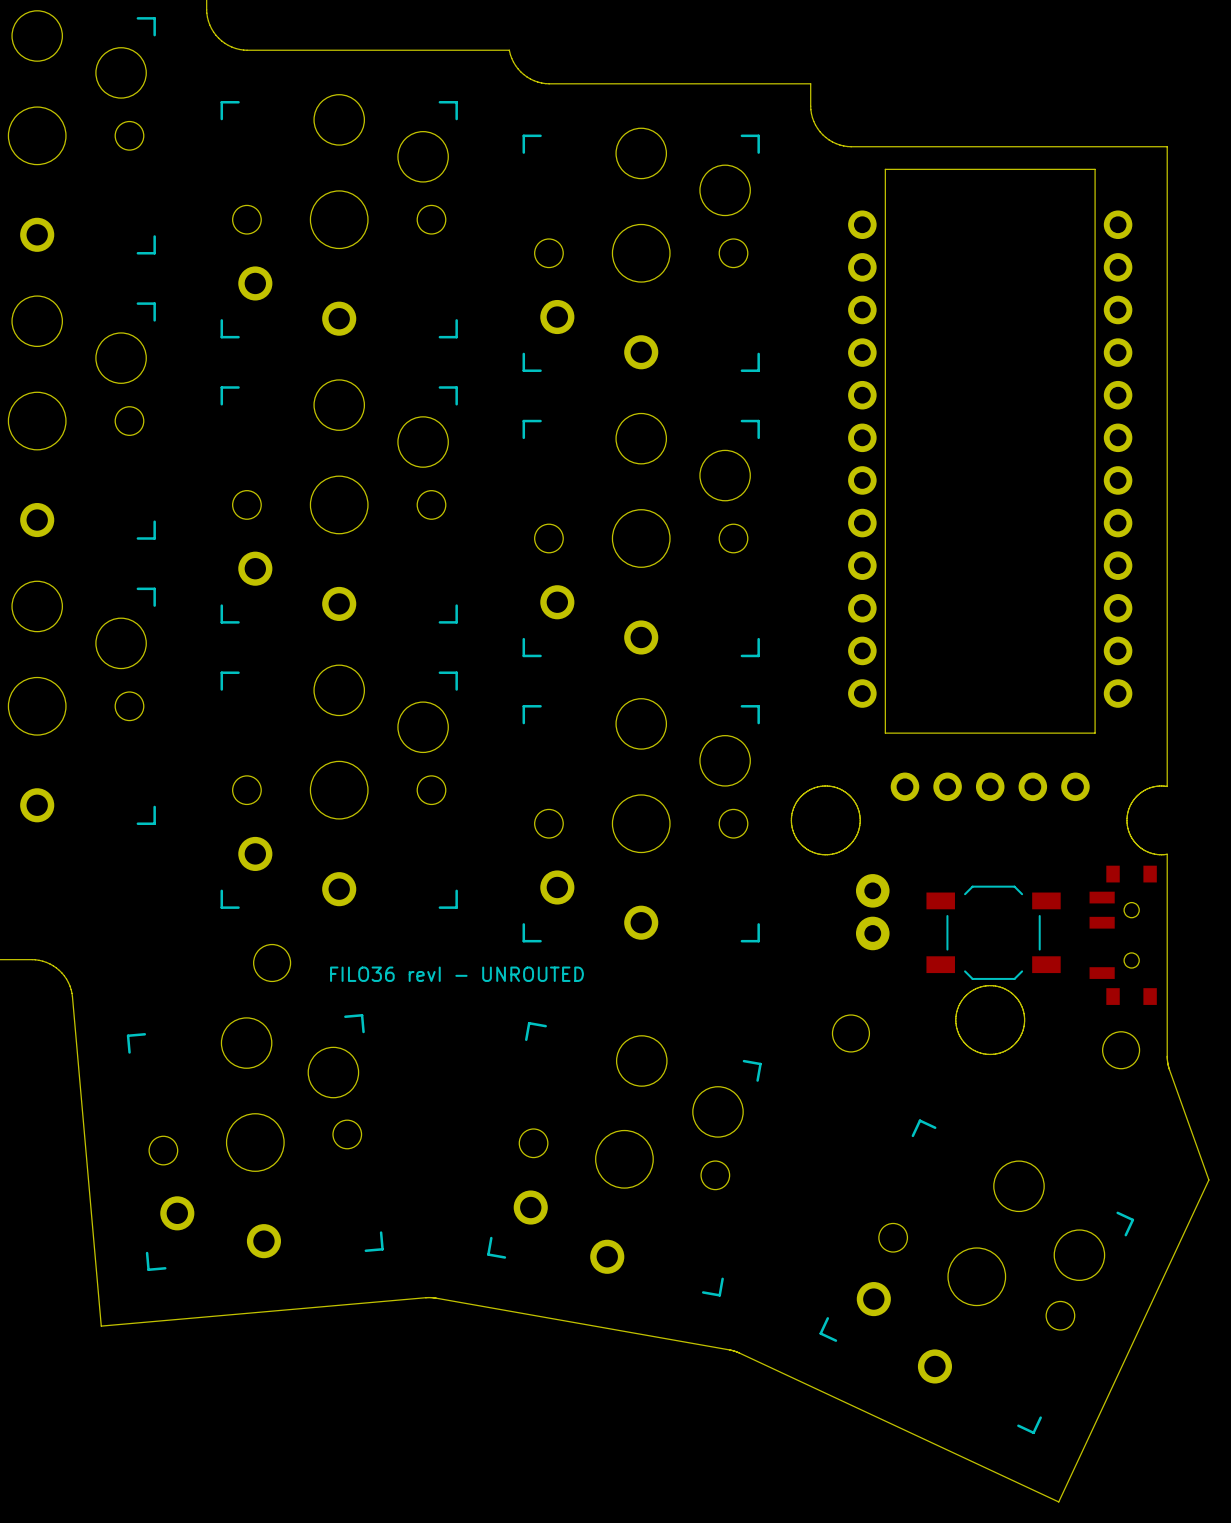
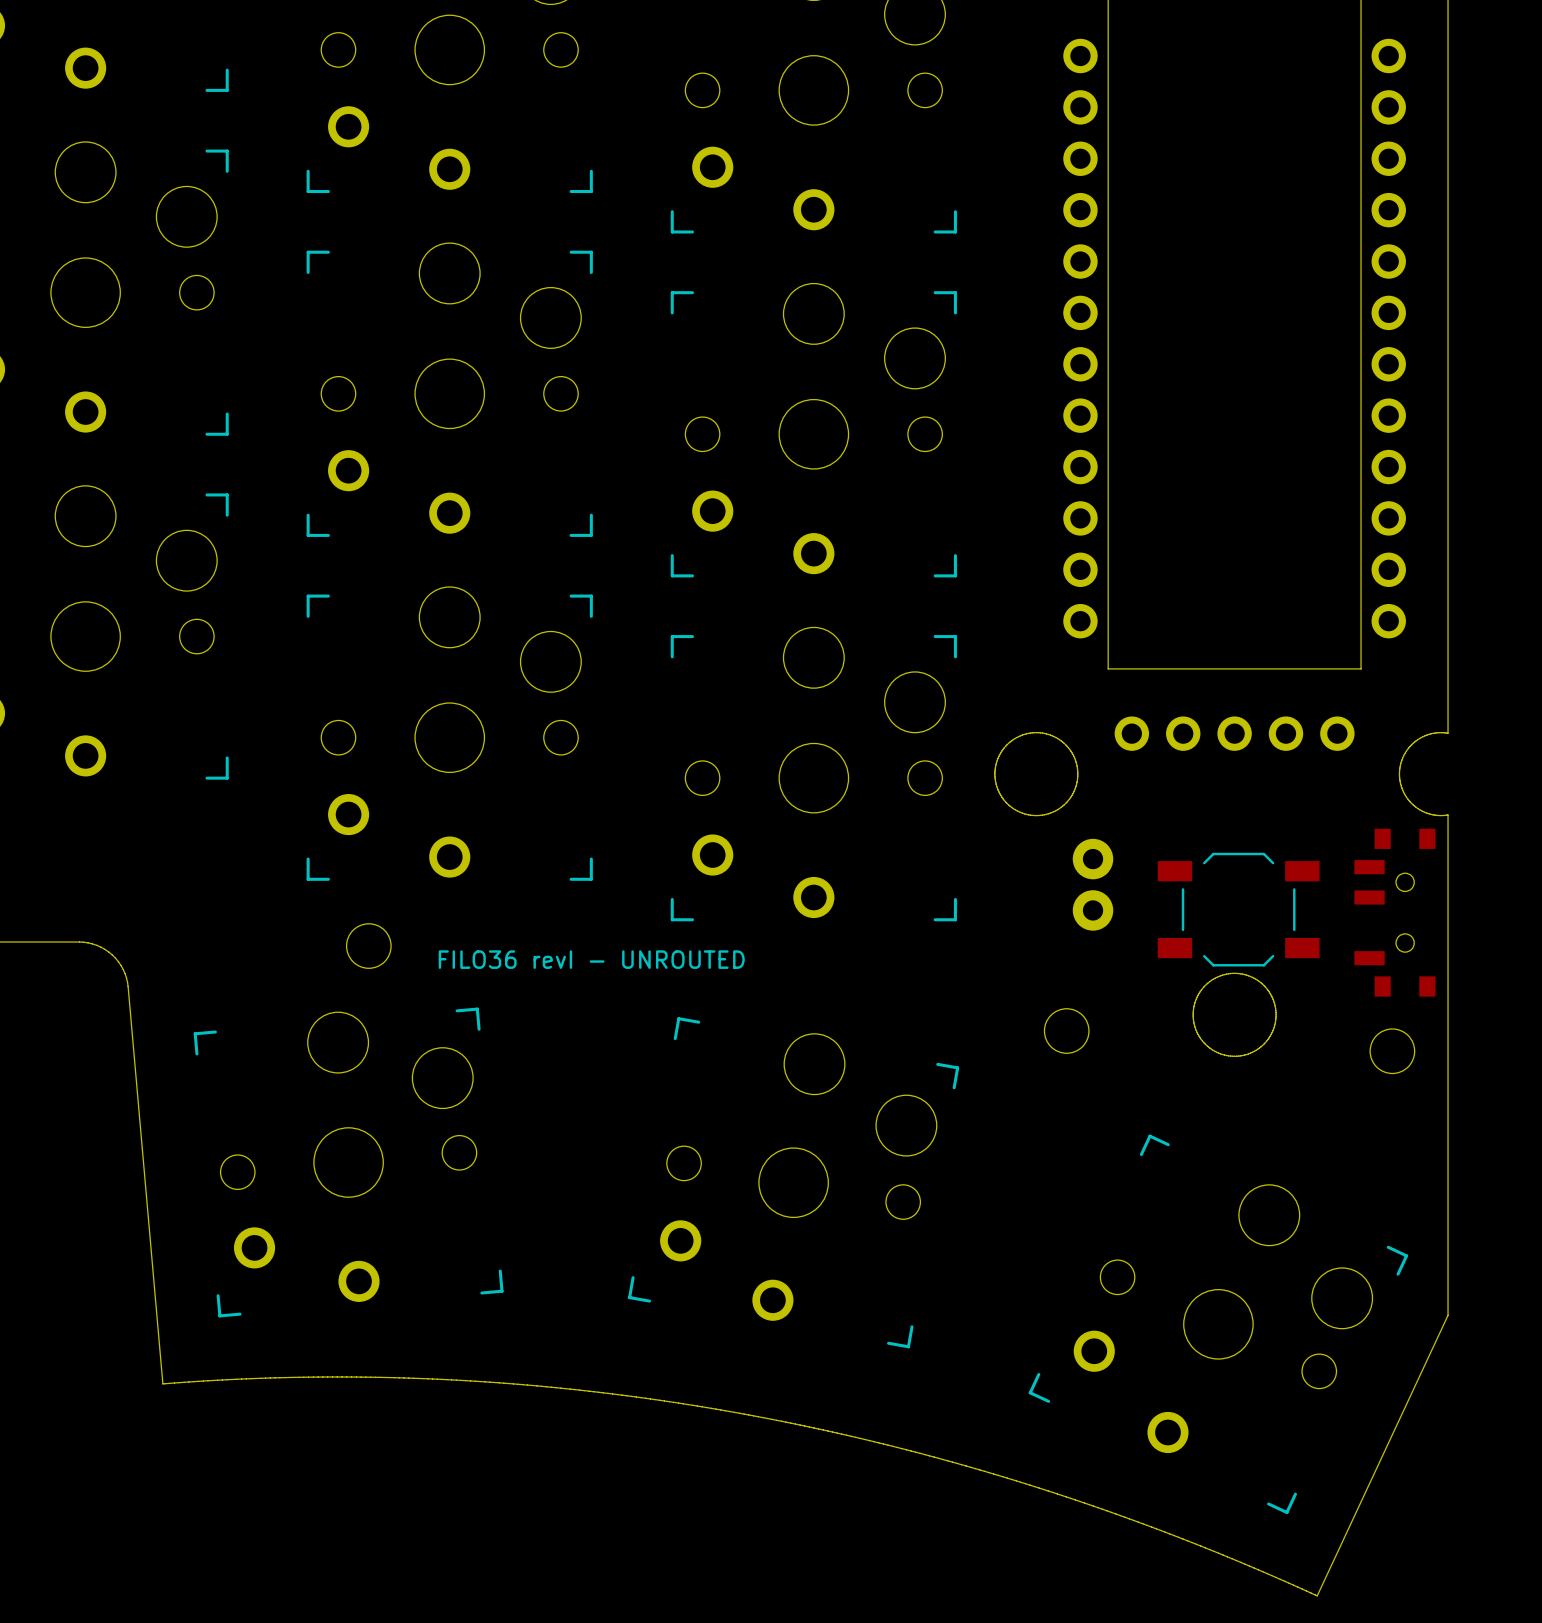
board edge: (1167, 1056) (1169, 1069) (1208, 1180) (1167, 1269) -> (1448, 1058) (1448, 1315)
board edge: (101, 1326) (430, 1297) (729, 1349) (1058, 1501) -> (162, 1383) (308, 1377) (451, 1379) (598, 1392) (744, 1414) (888, 1445) (1034, 1486) (1178, 1537) (1317, 1595)

